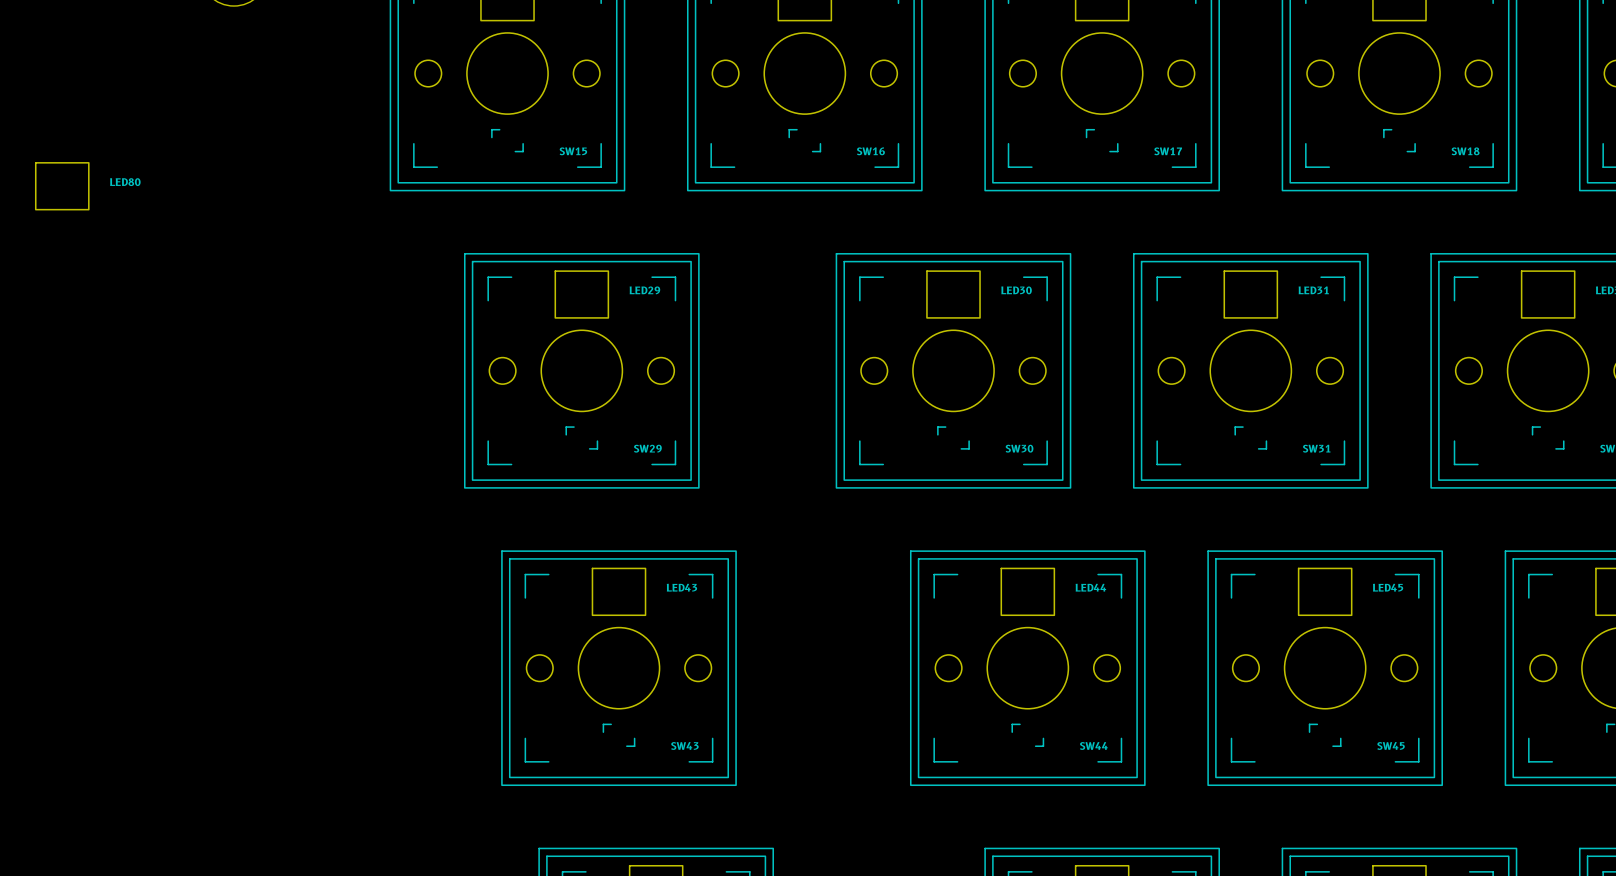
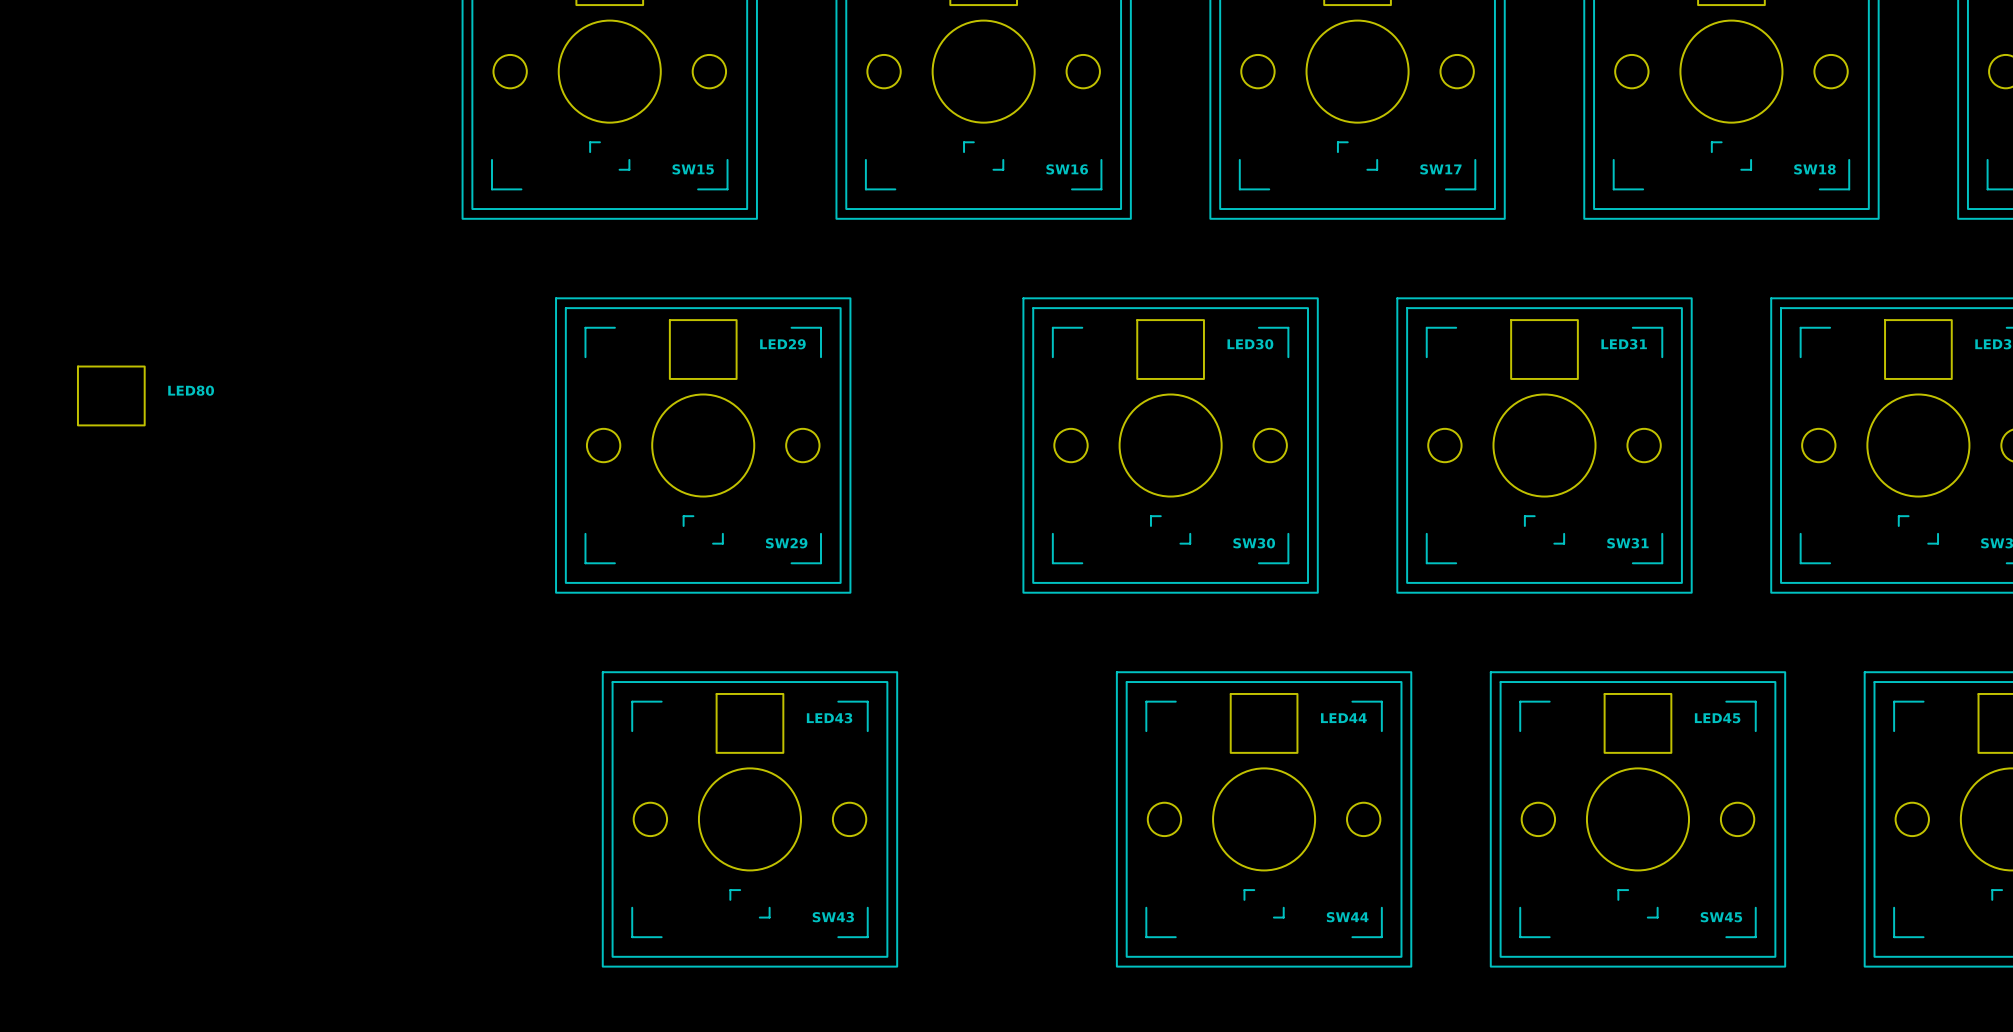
LED80 position: (62, 186) -> (111, 395)

